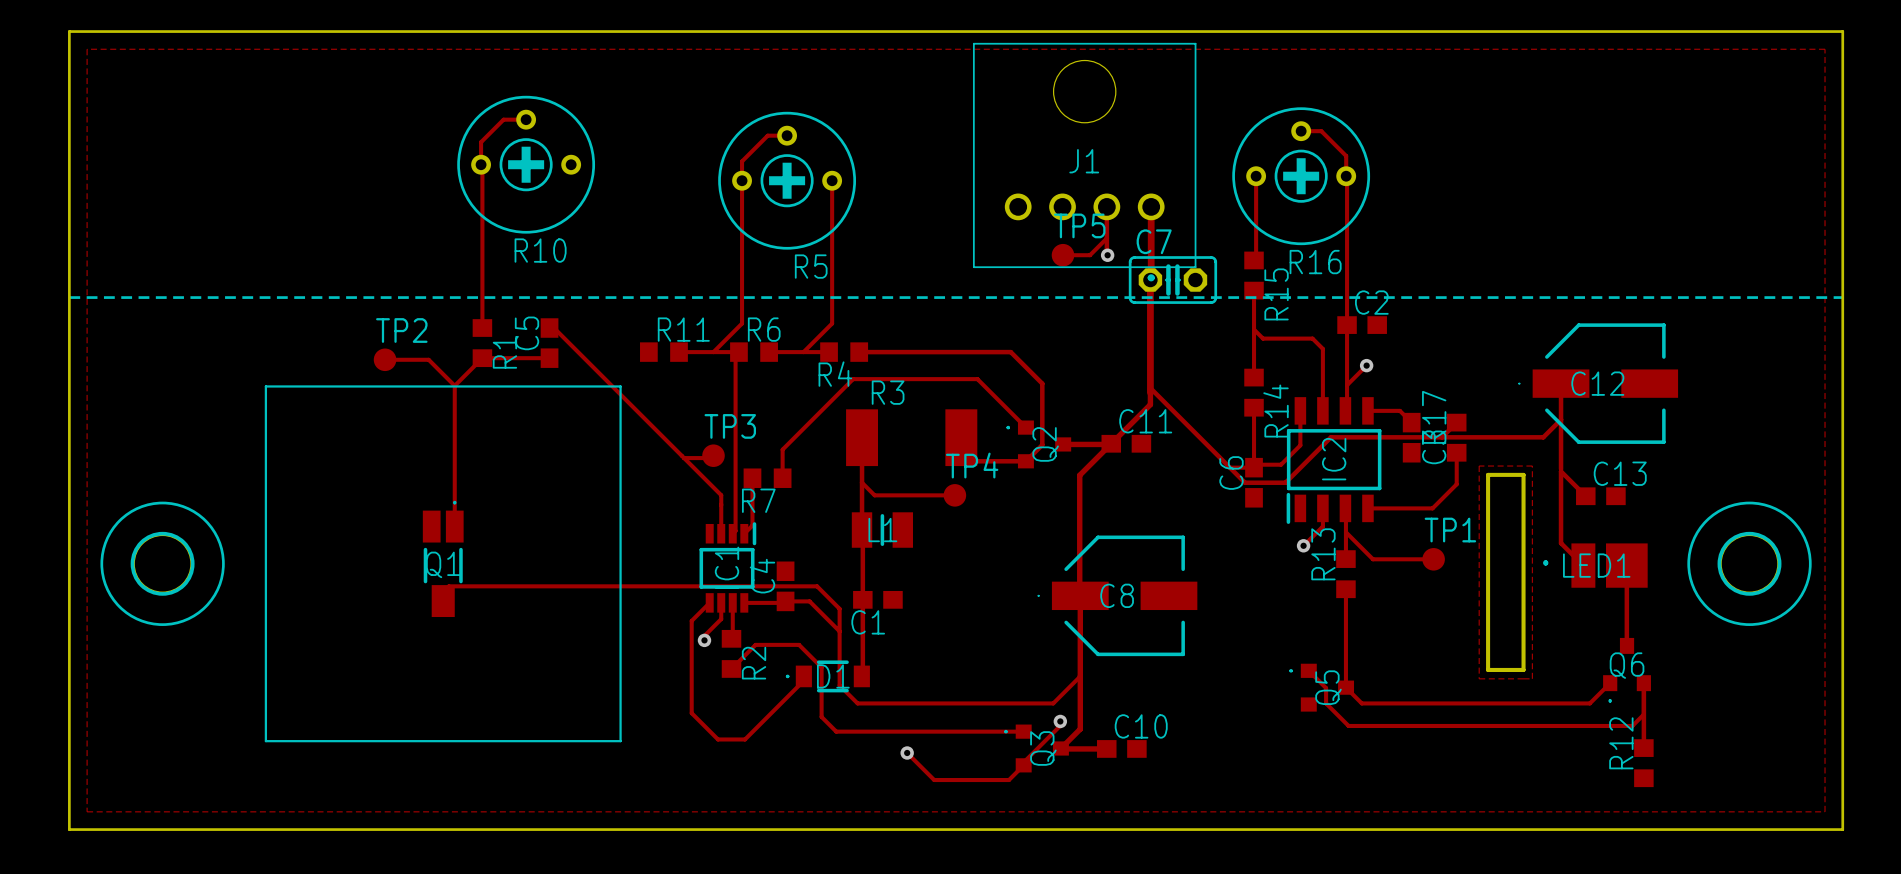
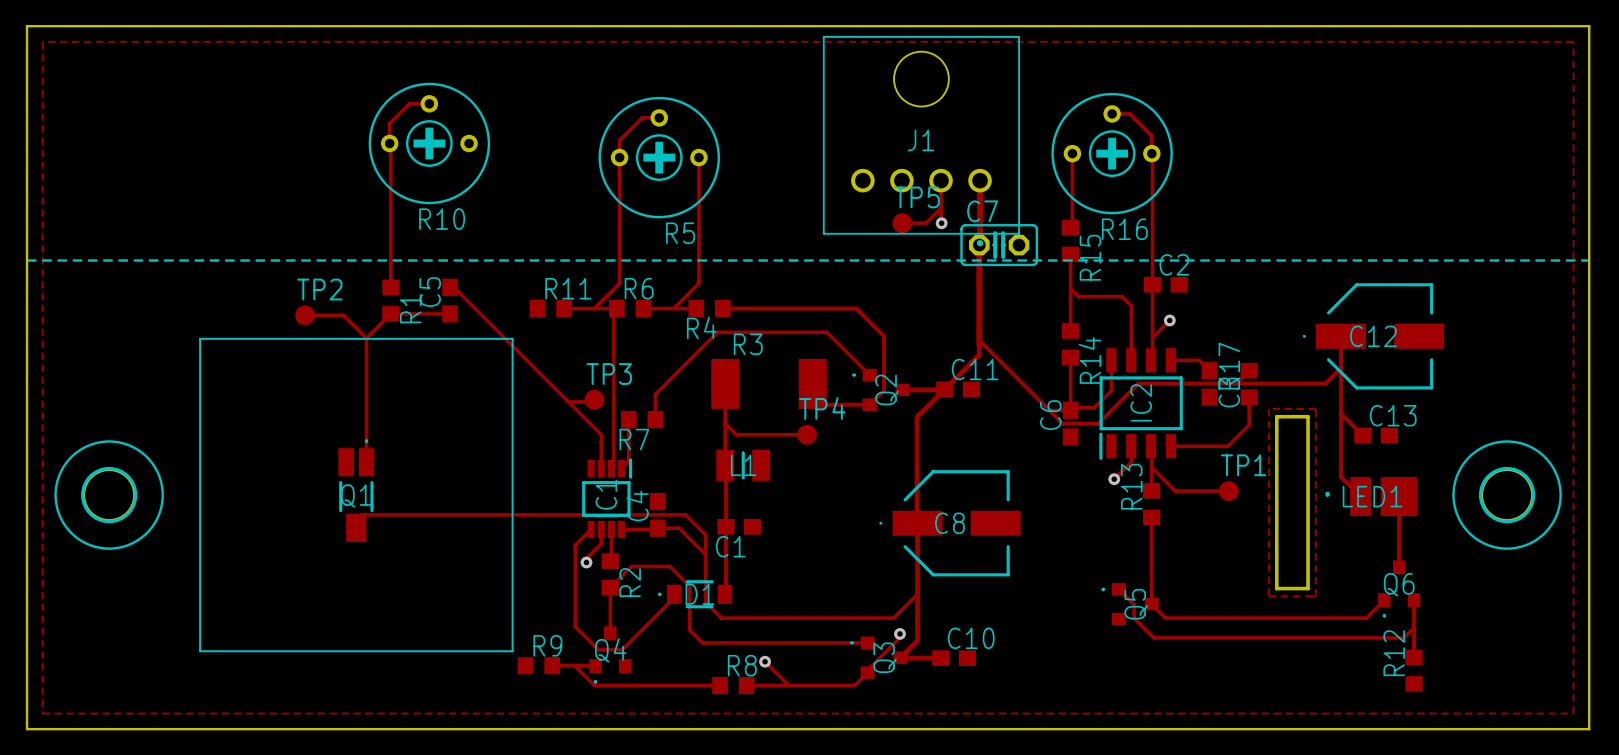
track: none -> (610, 587) (610, 633)
Q4: none -> (610, 654)
R9: none -> (538, 665)
track: none -> (552, 665) (595, 666)
track: none -> (574, 665) (594, 685) (720, 685)
R8: none -> (733, 685)
track: none -> (746, 685) (788, 685)

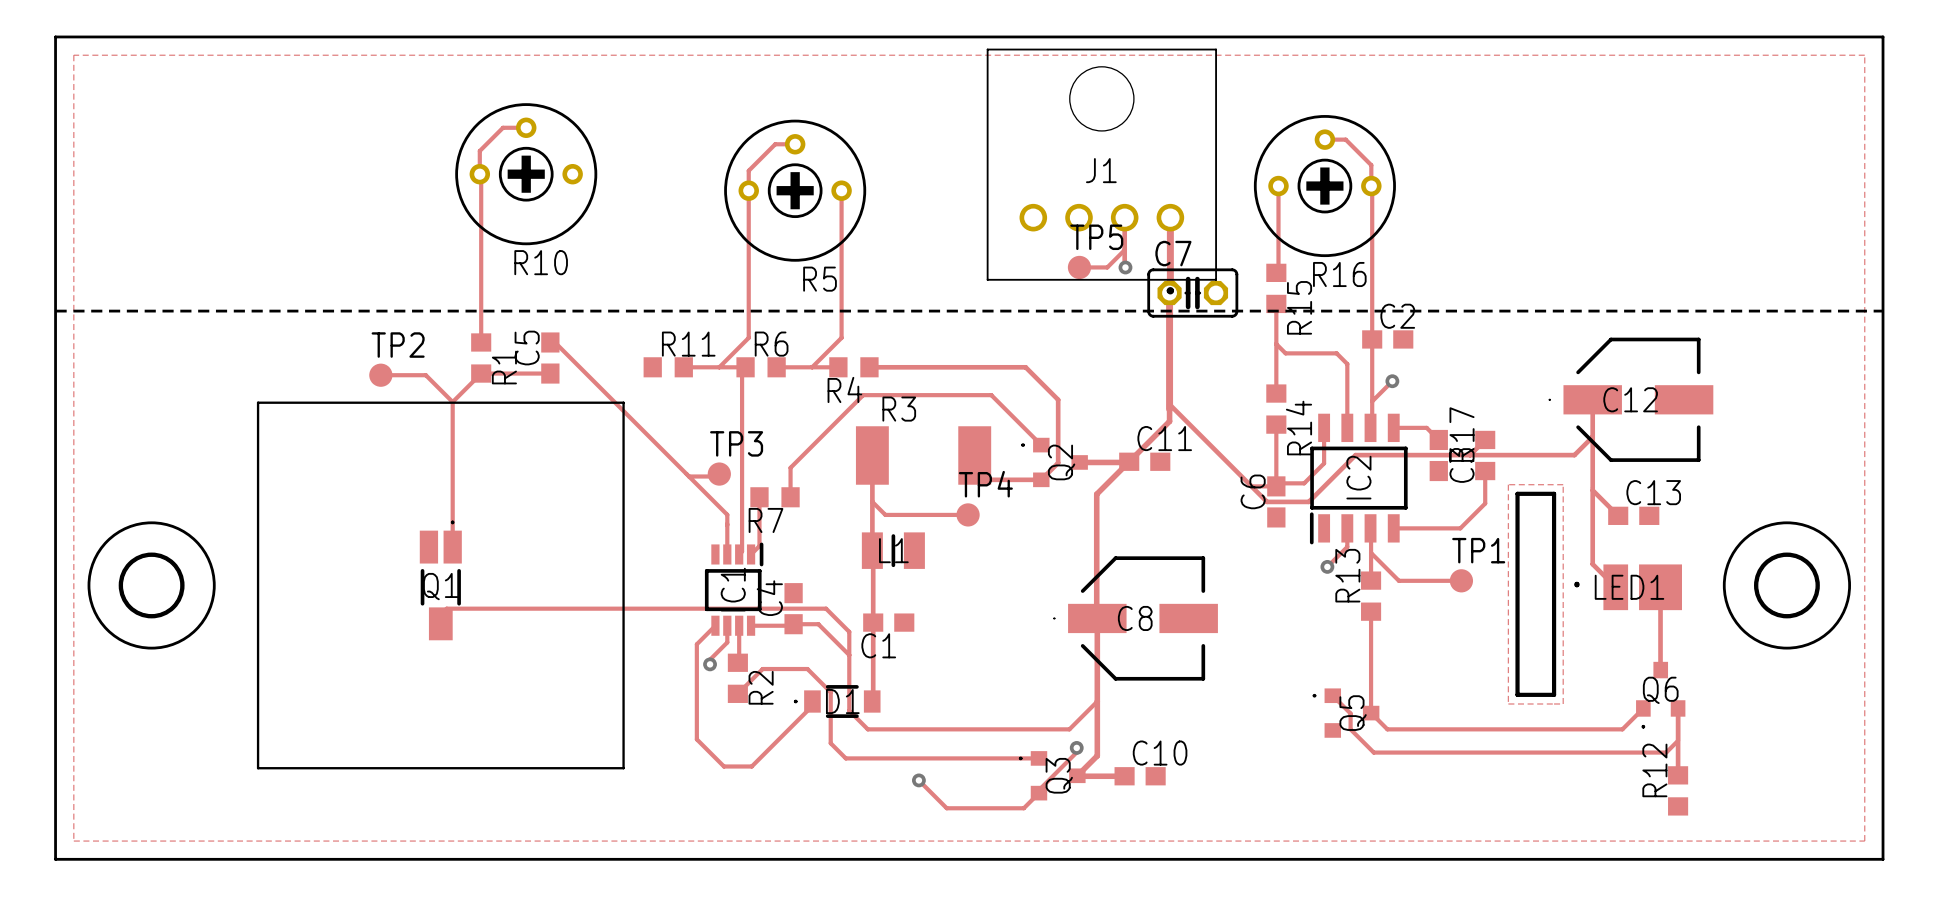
track: (610, 587) (610, 633) -> none
Q4: (610, 654) -> none
R9: (538, 665) -> none
track: (552, 665) (595, 666) -> none
track: (574, 665) (594, 685) (720, 685) -> none
R8: (733, 685) -> none
track: (746, 685) (788, 685) -> none

